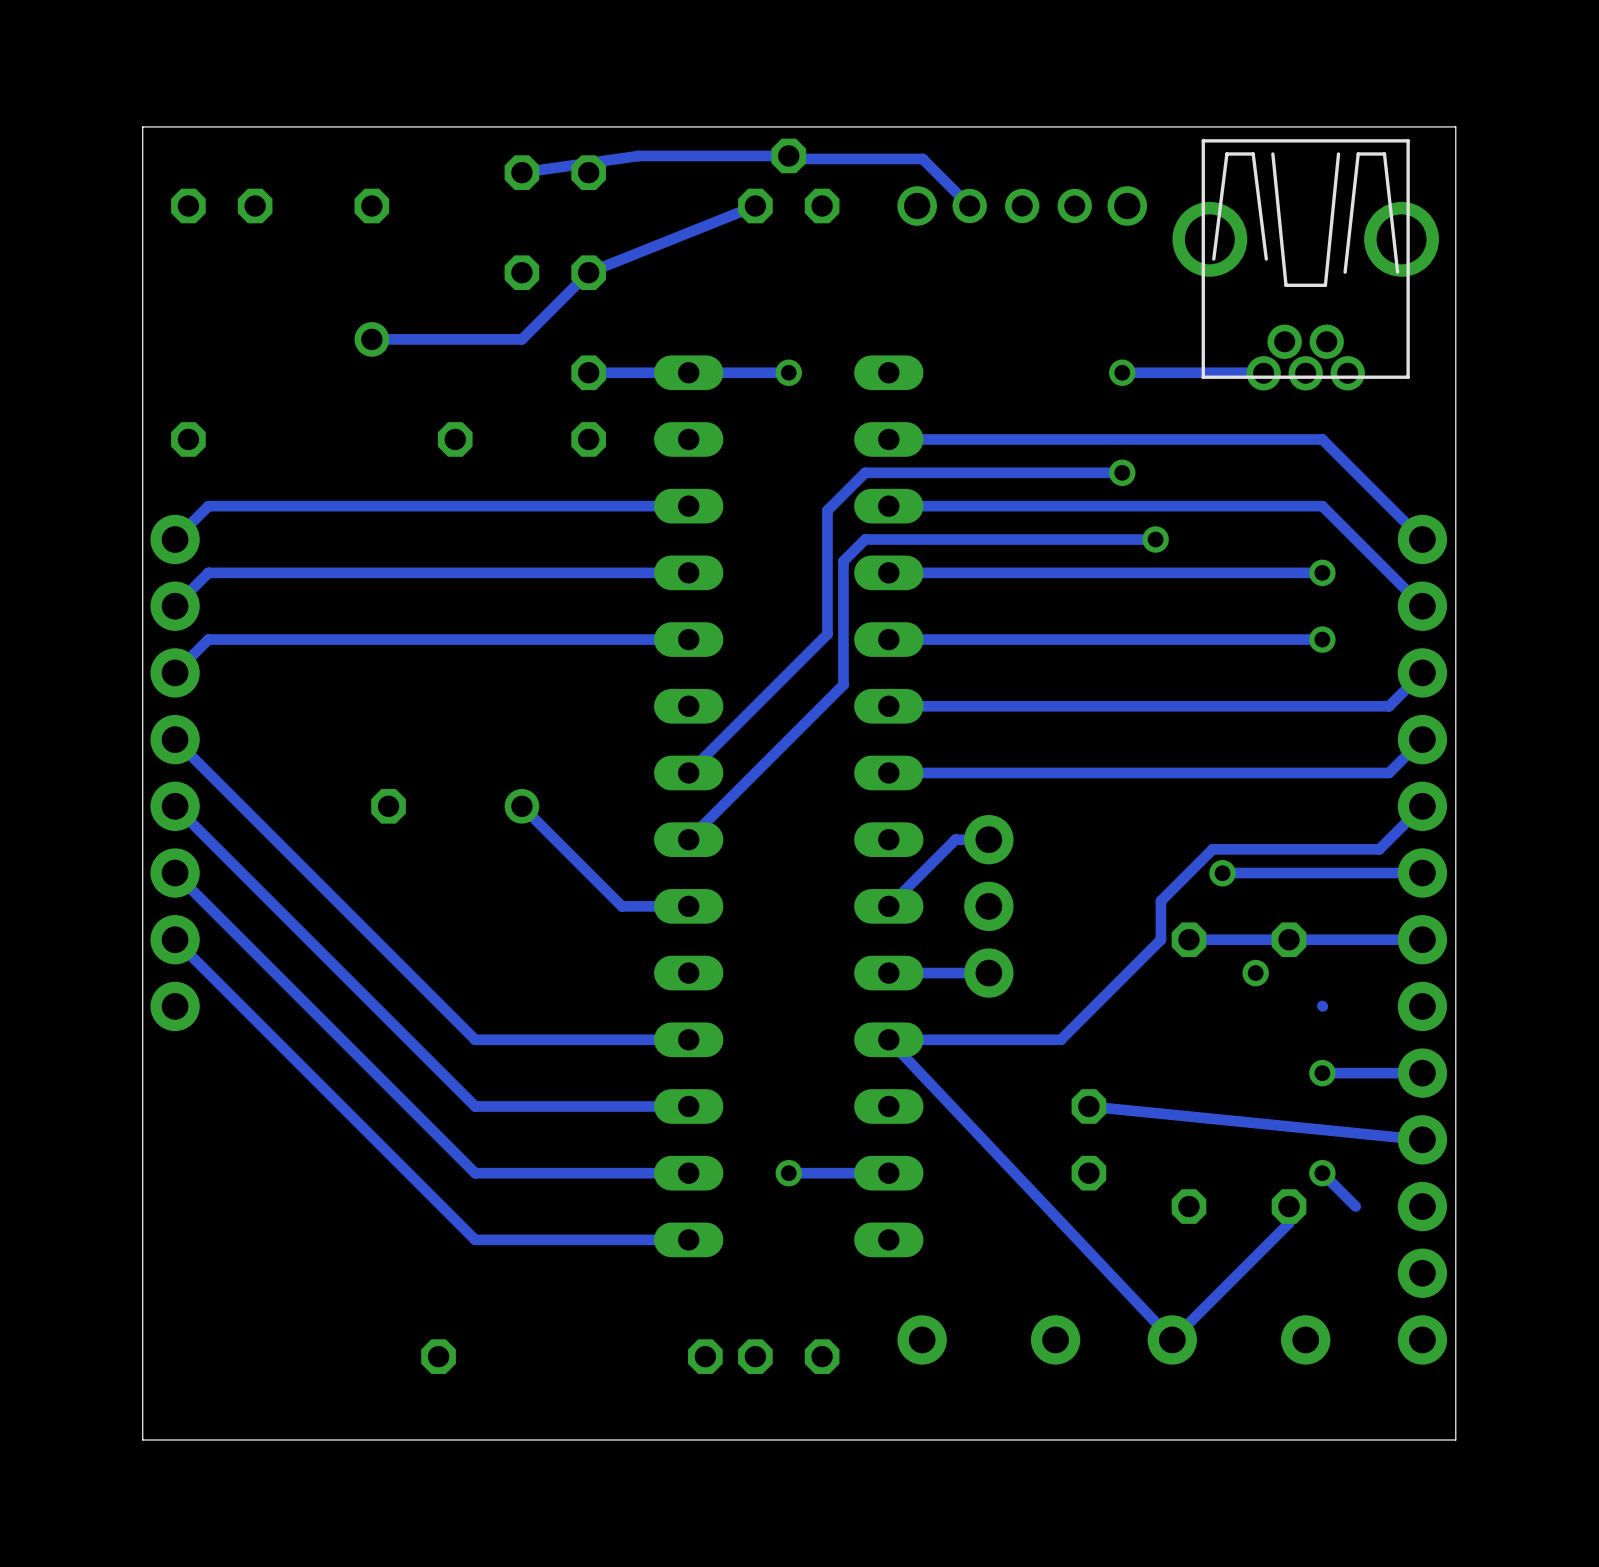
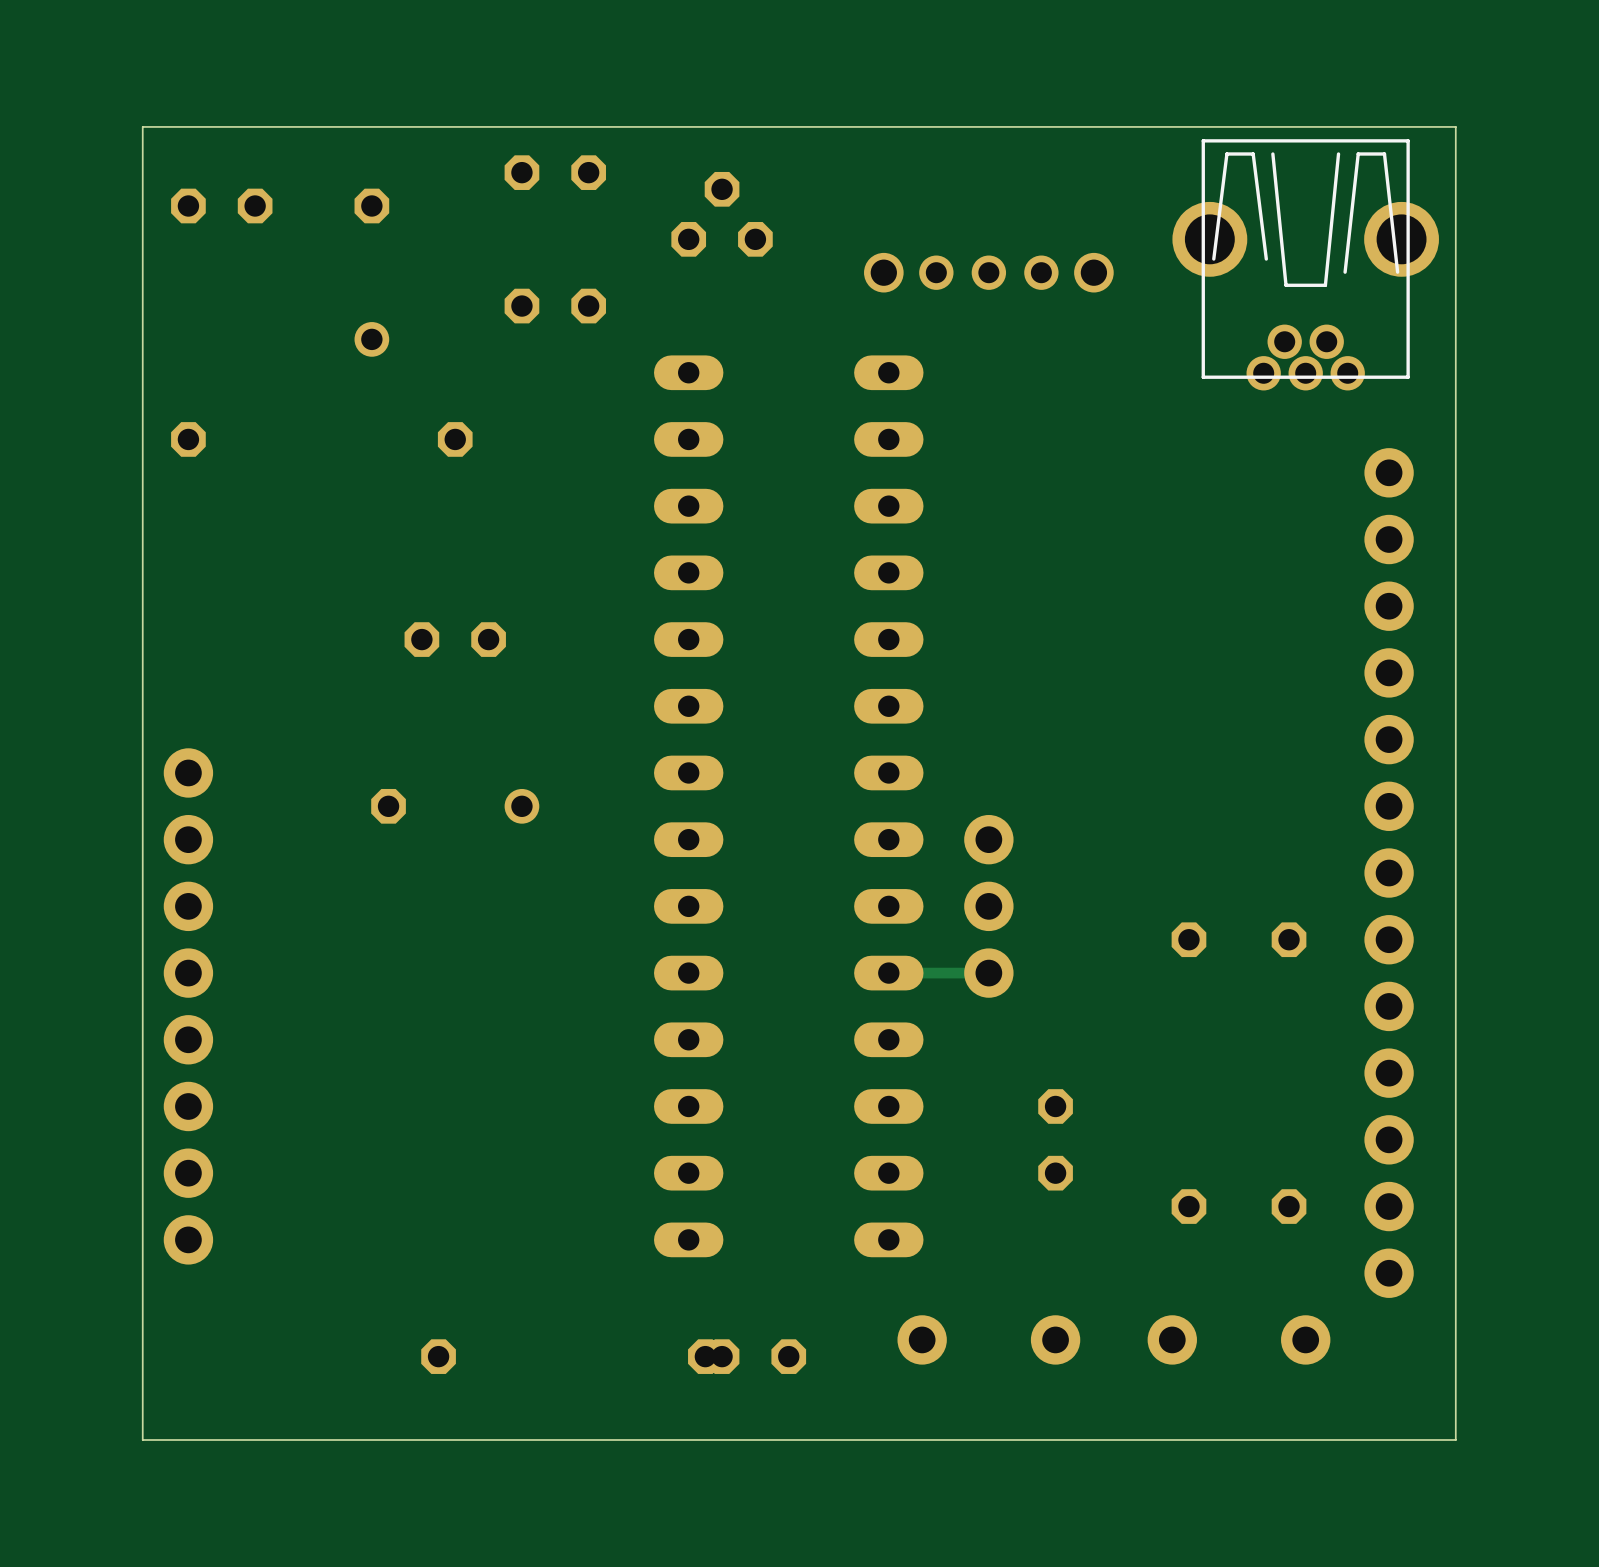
track: (788, 155) (638, 155) (521, 172) -> none
track: (788, 158) (922, 158) (969, 205) -> none
part position: (788, 180) -> (722, 214)
track: (755, 205) (588, 272) (521, 339) (371, 339) -> none
part position: (1022, 205) -> (988, 272)
part position: (555, 272) -> (555, 306)
track: (788, 372) (588, 372) -> none
via: (788, 372) -> none
track: (1122, 372) (1263, 373) -> none
via: (1122, 372) -> none
part: (588, 406) -> none
track: (888, 439) (1322, 439) (1422, 539) -> none
track: (1122, 472) (865, 472) (827, 510) (827, 634) (688, 772) -> none
via: (1122, 472) -> none
track: (688, 506) (208, 506) (175, 539) -> none
track: (888, 506) (1322, 506) (1422, 606) -> none
track: (1155, 539) (865, 539) (843, 561) (843, 684) (688, 839) -> none
via: (1155, 539) -> none
track: (688, 572) (208, 572) (175, 606) -> none
track: (1322, 572) (888, 572) -> none
via: (1322, 572) -> none
part: none -> (455, 639)
track: (688, 639) (208, 639) (175, 672) -> none
track: (1322, 639) (888, 639) -> none
via: (1322, 639) -> none
track: (1422, 672) (1389, 706) (888, 706) -> none
track: (175, 739) (475, 1039) (688, 1039) -> none
track: (1422, 739) (1389, 772) (888, 772) -> none
part position: (175, 772) -> (188, 1006)
part position: (1422, 772) -> (1389, 706)
track: (175, 806) (475, 1106) (688, 1106) -> none
track: (521, 806) (622, 906) (688, 906) -> none
track: (1422, 806) (1379, 849) (1212, 849) (1160, 901) (1160, 939) (1060, 1039) (888, 1039) (1172, 1339) (1289, 1223) (1289, 1206) -> none
track: (988, 839) (955, 839) (888, 906) -> none
track: (175, 873) (475, 1173) (688, 1173) -> none
via: (1222, 873) -> none
track: (1422, 873) (1222, 873) -> none
track: (175, 939) (475, 1239) (688, 1239) -> none
track: (1422, 939) (1188, 939) -> none
via: (1255, 973) -> none
track: (1322, 1006) (1322, 1006) -> none
via: (1322, 1073) -> none
track: (1422, 1073) (1322, 1073) -> none
track: (1088, 1106) (1422, 1139) -> none
part position: (1088, 1139) -> (1055, 1139)
via: (788, 1173) -> none
track: (888, 1173) (788, 1173) -> none
track: (1322, 1173) (1355, 1206) -> none
via: (1322, 1173) -> none
part position: (1422, 1206) -> (1389, 1139)
part position: (788, 1356) -> (755, 1356)

